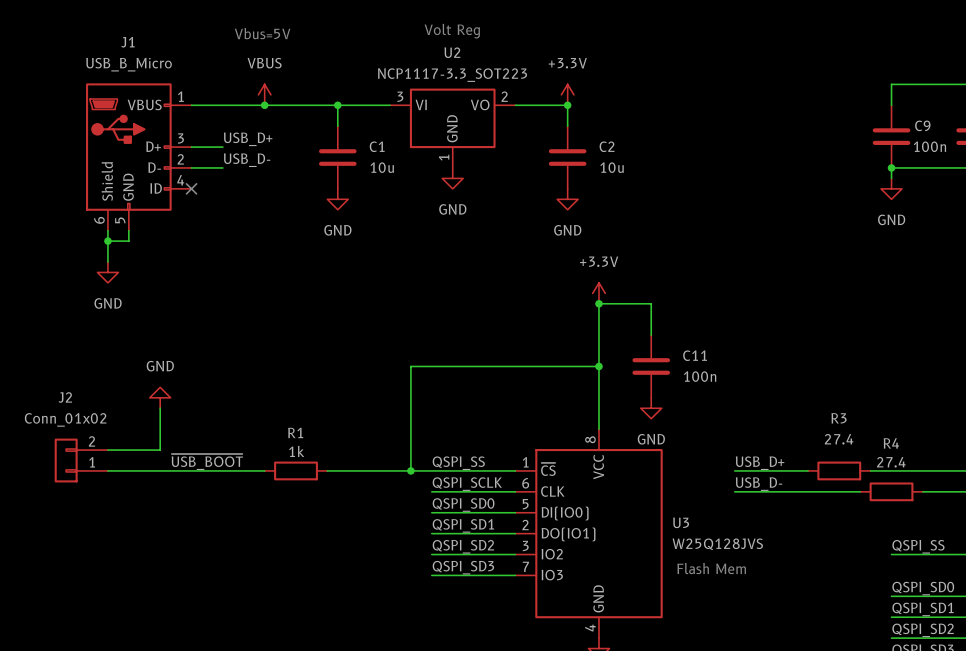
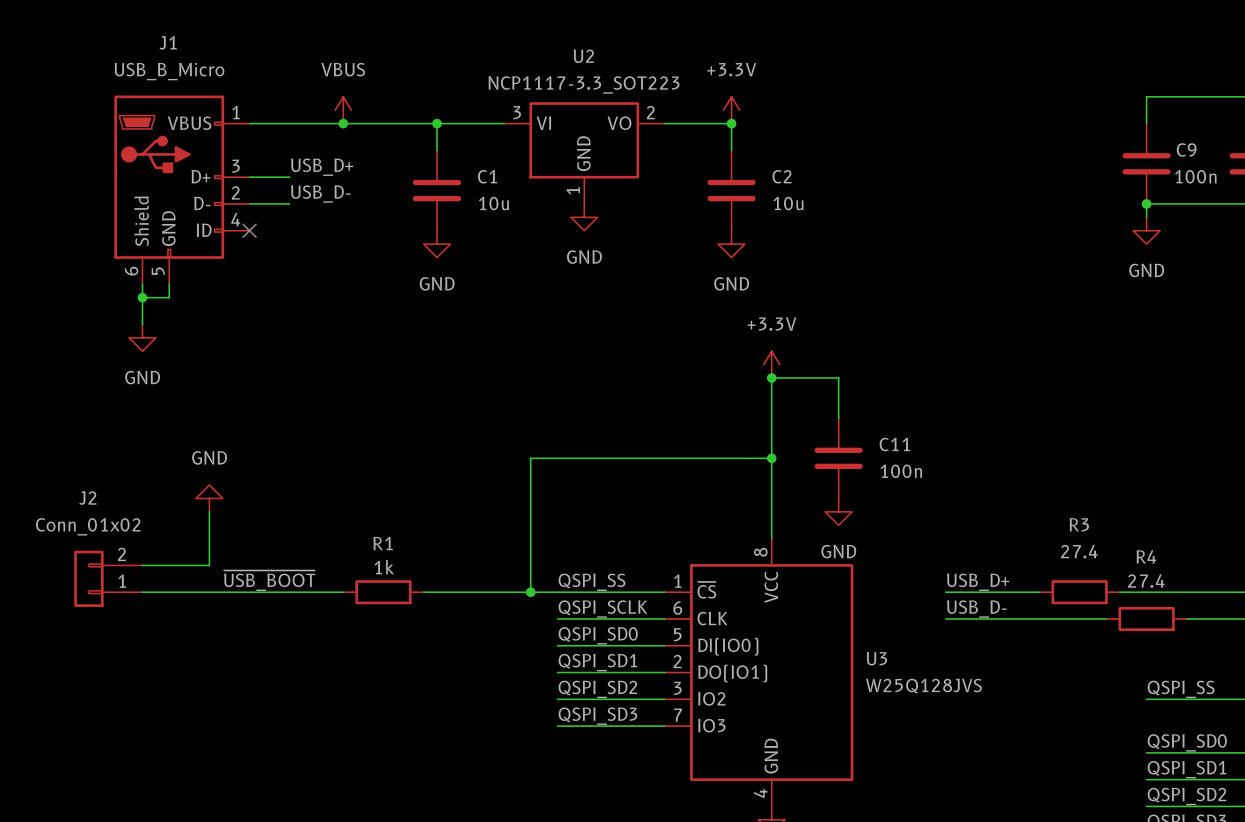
text: Volt Reg (452, 31) -> none
text: Vbus=5V (262, 33) -> none
text: Flash Mem (711, 568) -> none

